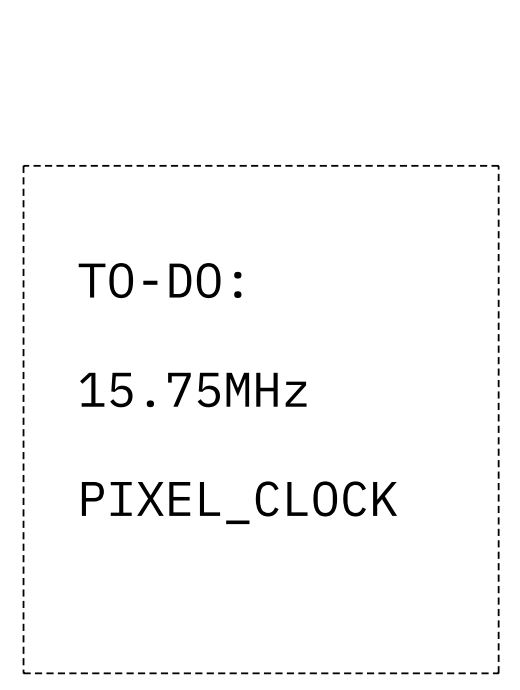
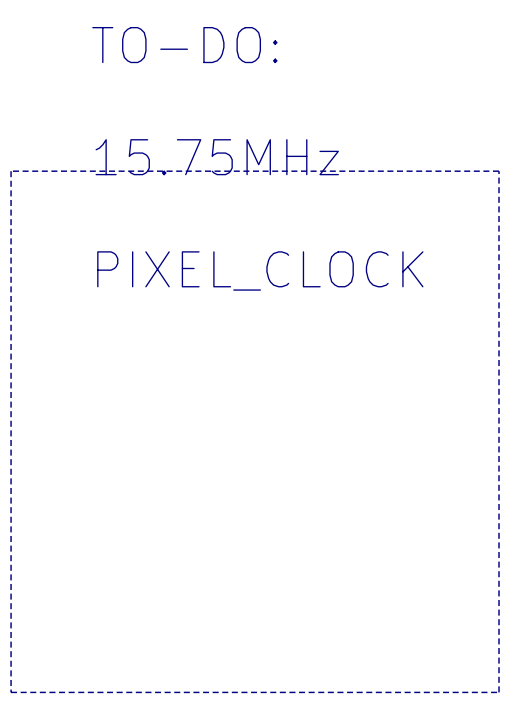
text: none -> TO-DO: (184, 45)
text: none -> 15.75MHz (217, 157)
text: none -> PIXEL_CLOCK (260, 270)
text: TO-DO: (160, 280) -> none
text: 15.75MHz (193, 390) -> none
text: PIXEL_CLOCK (239, 502) -> none

